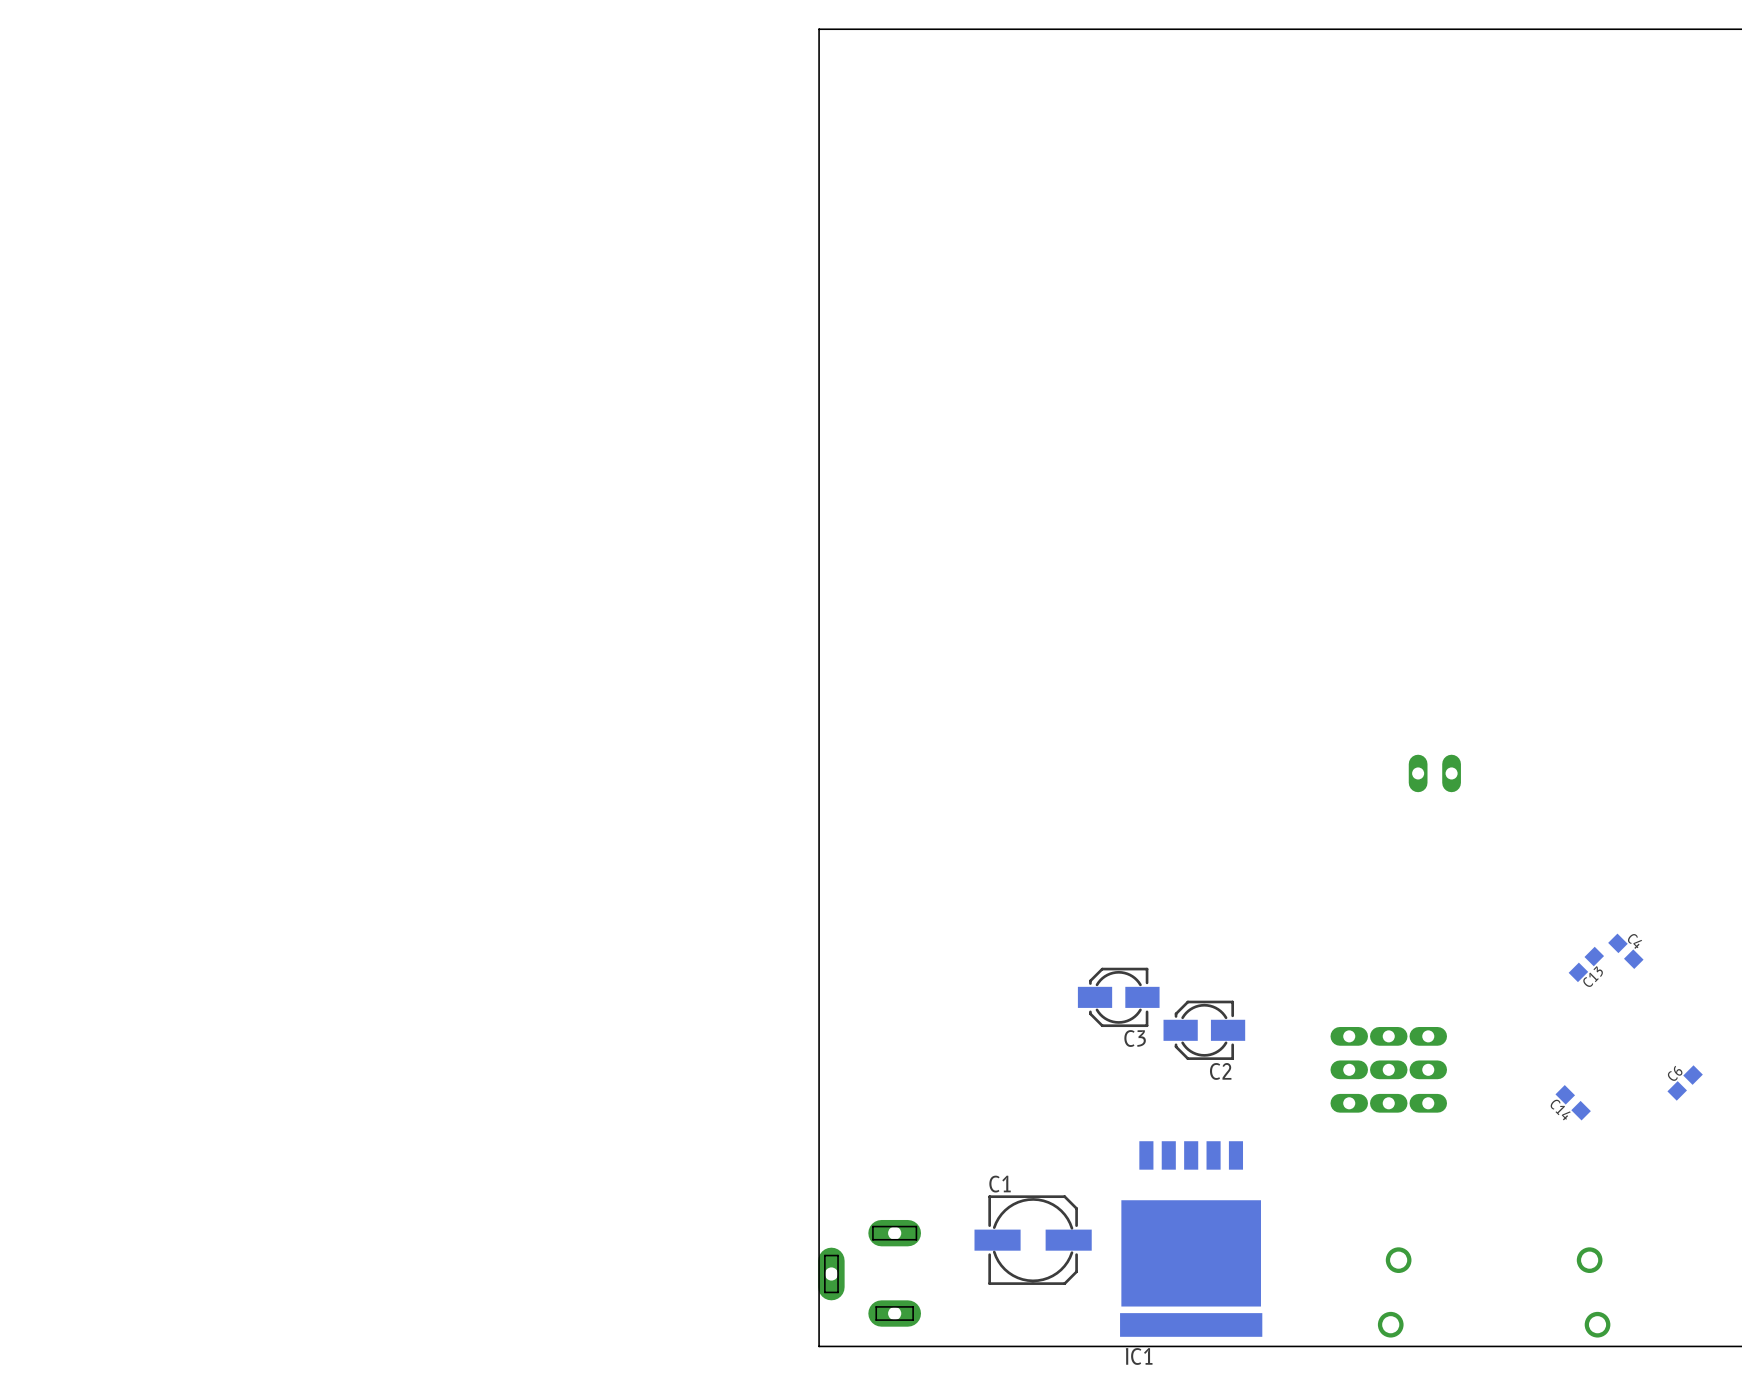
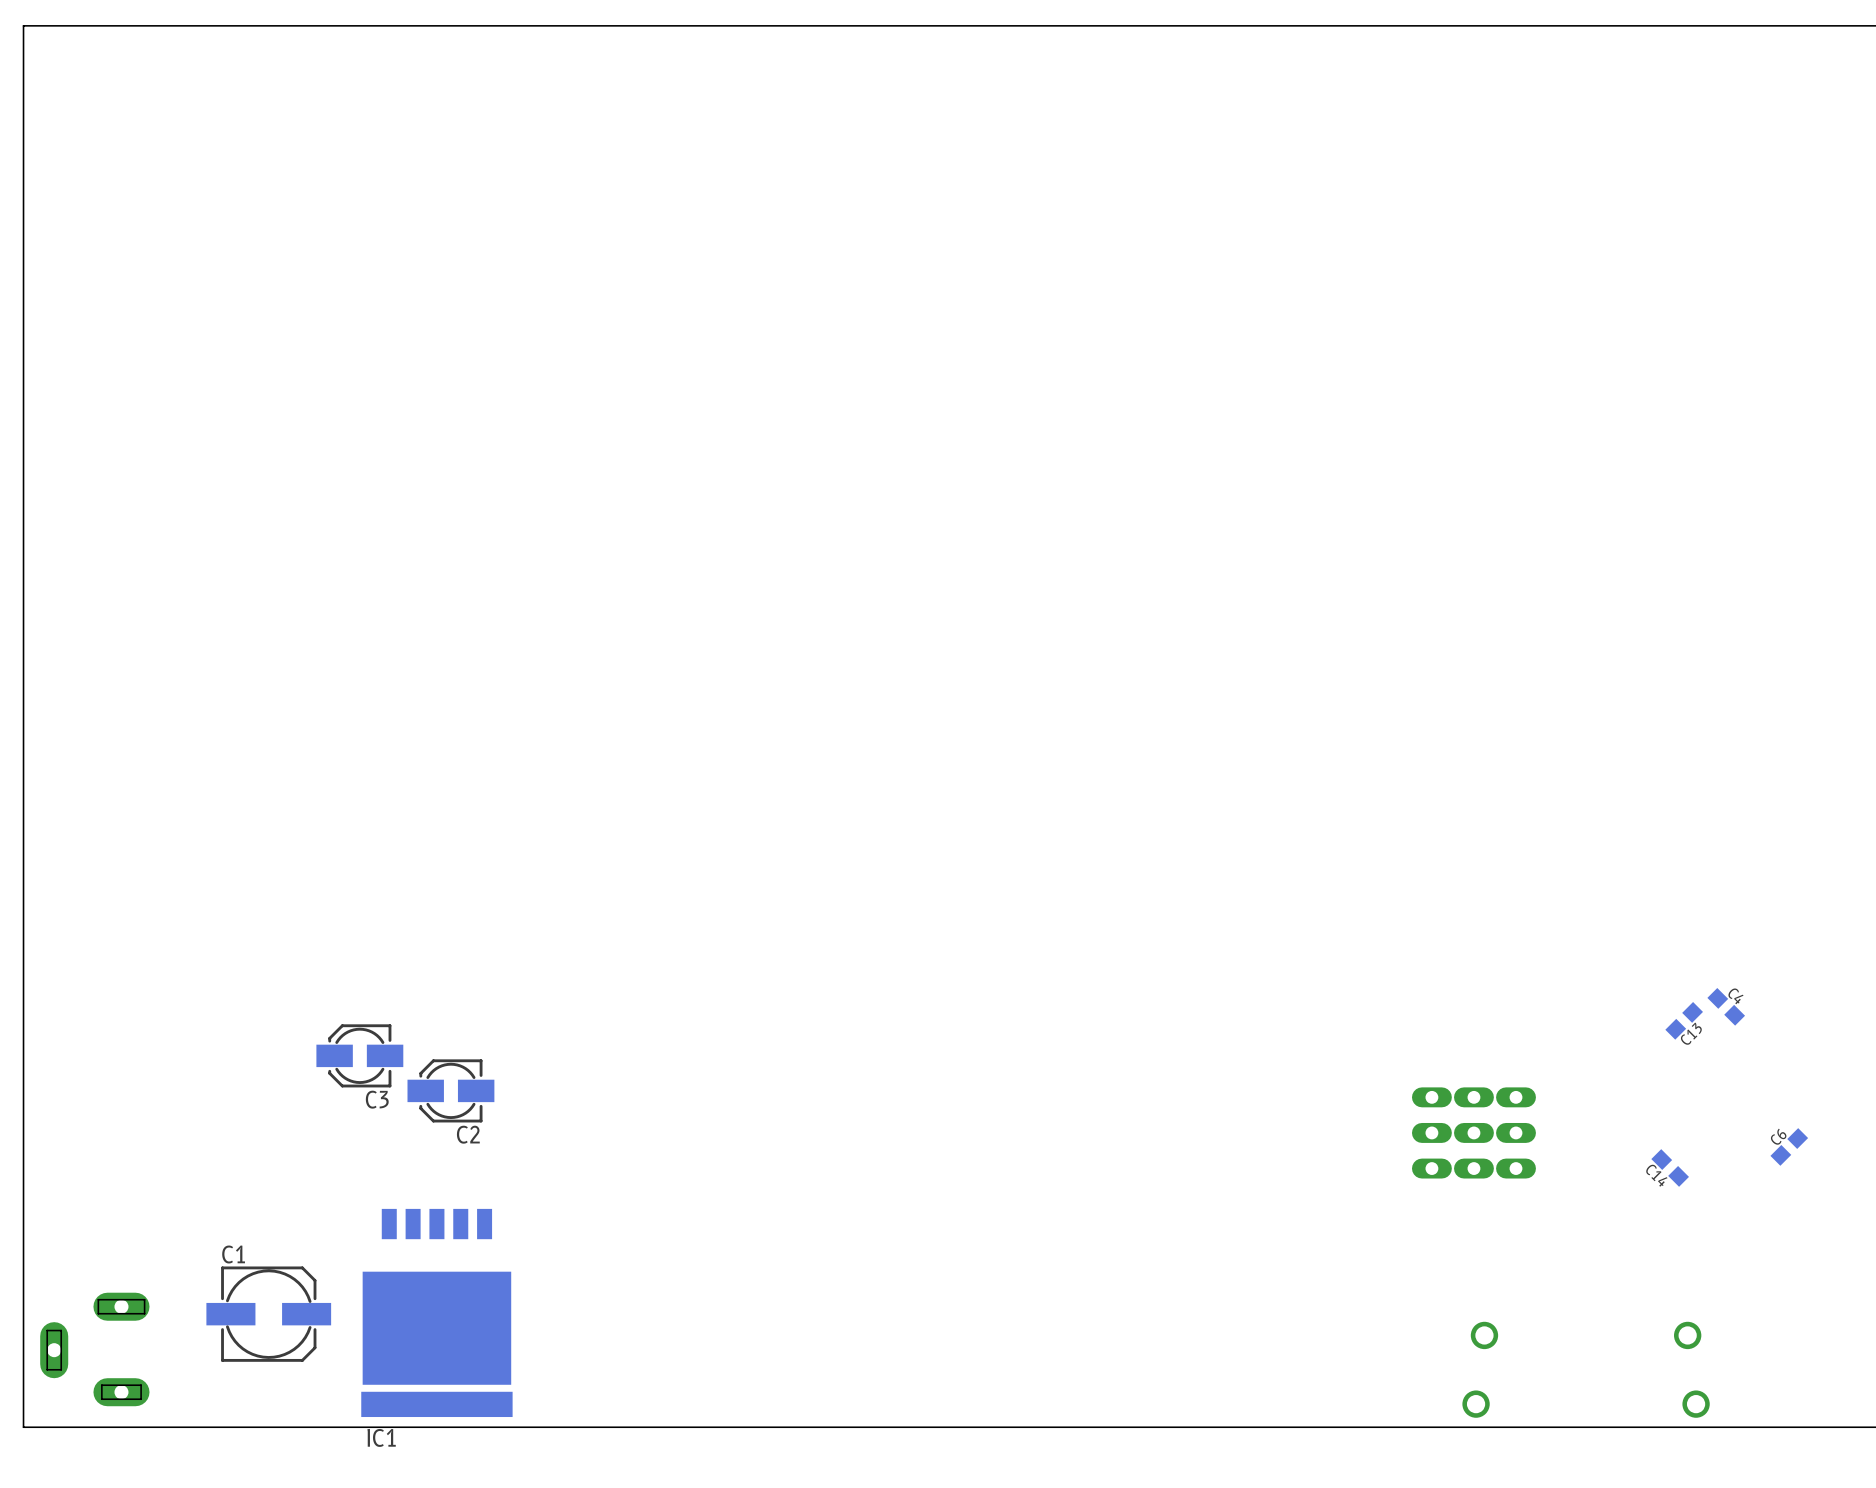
board edge: (819, 29) (819, 1346) -> (867, 25) (23, 25) (23, 1427) (867, 1427)
part: (1434, 773) -> none
C3 position: (1118, 997) -> (359, 1055)
C2 position: (1204, 1030) -> (450, 1090)
IC1 position: (1191, 1239) -> (436, 1312)
C1 position: (1033, 1240) -> (268, 1314)
part: none -> (94, 1349)
part: (869, 1273) -> none

